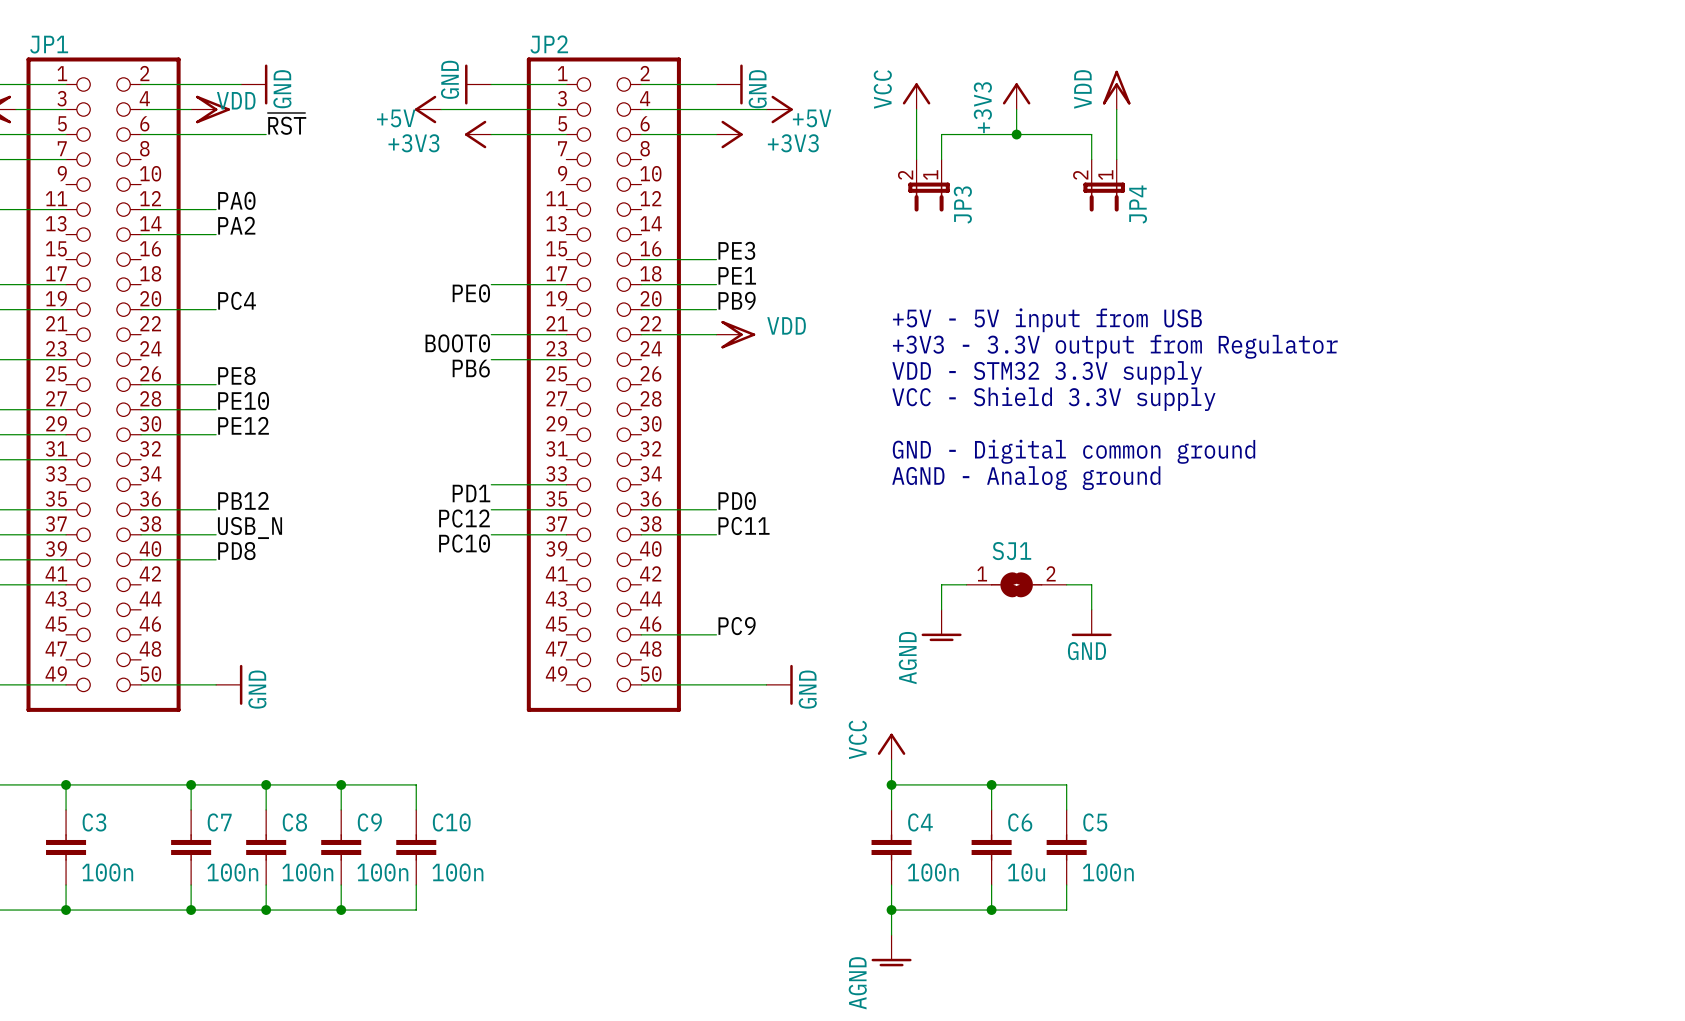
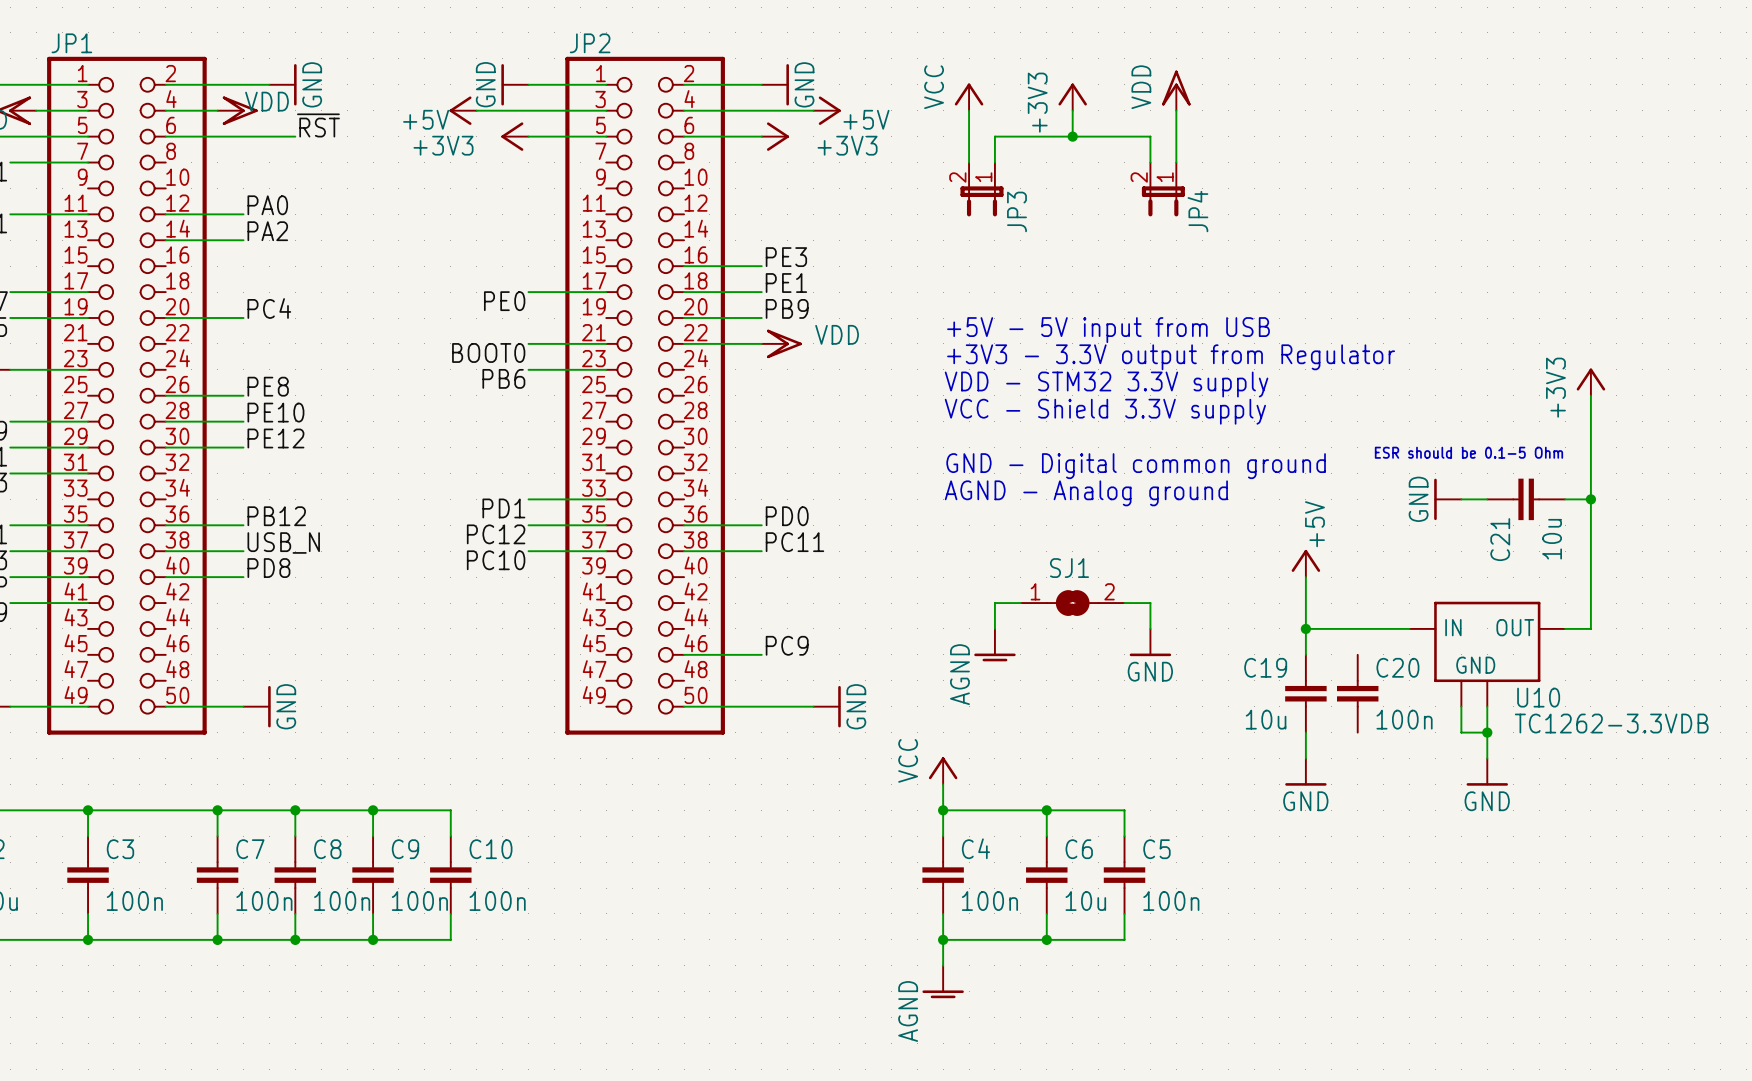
power symbol: none -> +3V3 (1590, 382)
wire: none -> (1590, 395) (1590, 628) (1565, 628)
text: none -> ESR should be 0.1-5 Ohm (1468, 452)
power symbol: none -> GND (1447, 499)
wire: none -> (1461, 499) (1487, 499)
C21: none -> 10u (1526, 499)
wire: none -> (1565, 499) (1590, 499)
junction: none -> (1590, 499)
power symbol: none -> +5V (1305, 563)
wire: none -> (1305, 577) (1305, 654)
wire: none -> (1305, 628) (1409, 628)
junction: none -> (1305, 628)
U10: none -> TC1262-3.3VDB (1487, 654)
C19: none -> 10u (1305, 693)
C20: none -> 100n (1357, 693)
wire: none -> (1461, 706) (1461, 732) (1487, 732)
wire: none -> (1487, 706) (1487, 758)
wire: none -> (1305, 732) (1305, 758)
junction: none -> (1487, 732)
power symbol: none -> GND (1305, 772)
power symbol: none -> GND (1487, 772)

